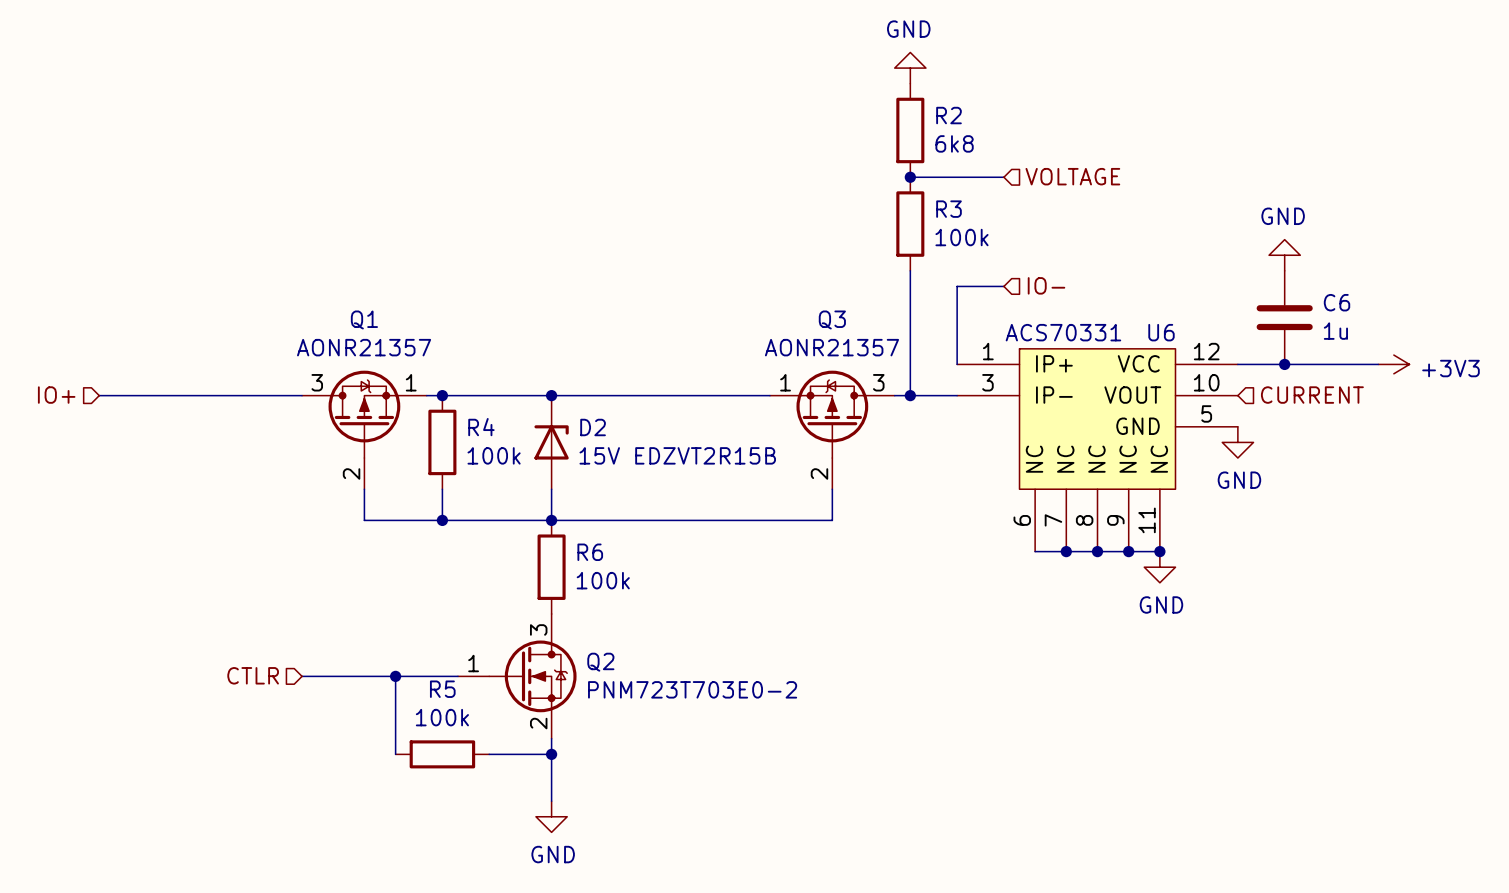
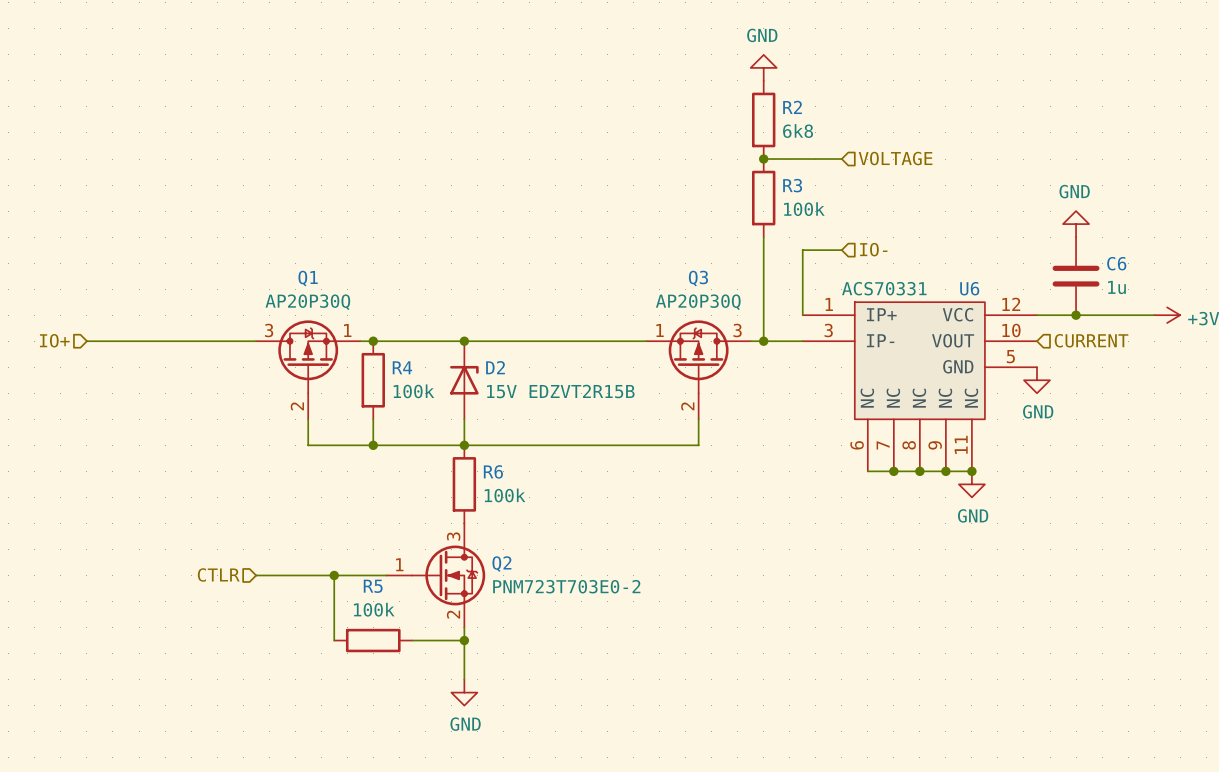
Q1 value: AONR21357 (364, 347) -> AP20P30Q (307, 302)
Q3 value: AONR21357 (831, 347) -> AP20P30Q (698, 302)

